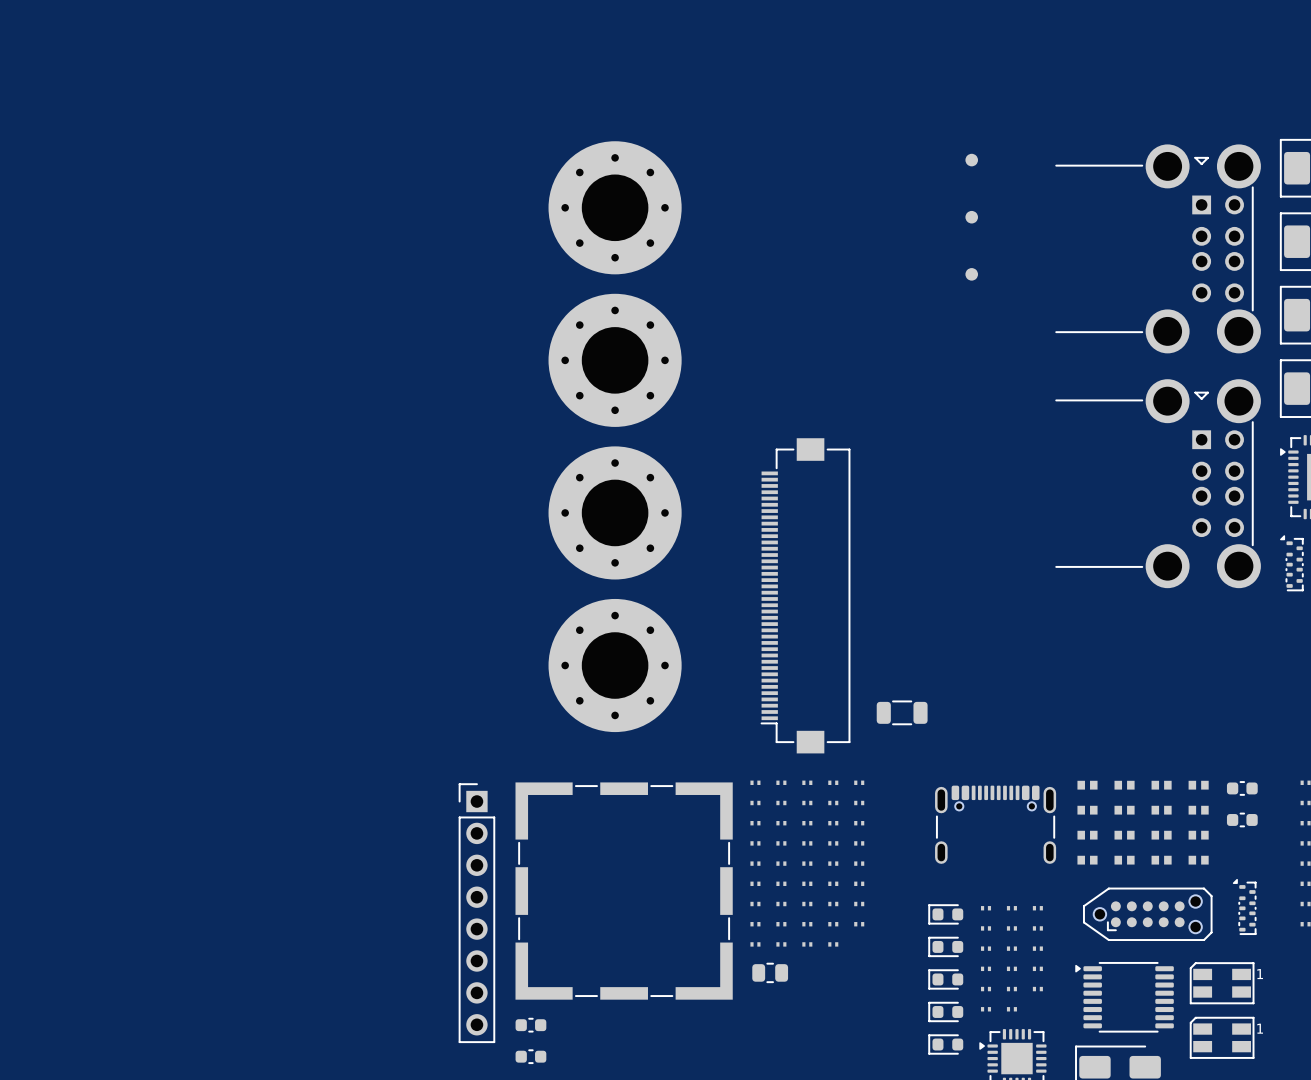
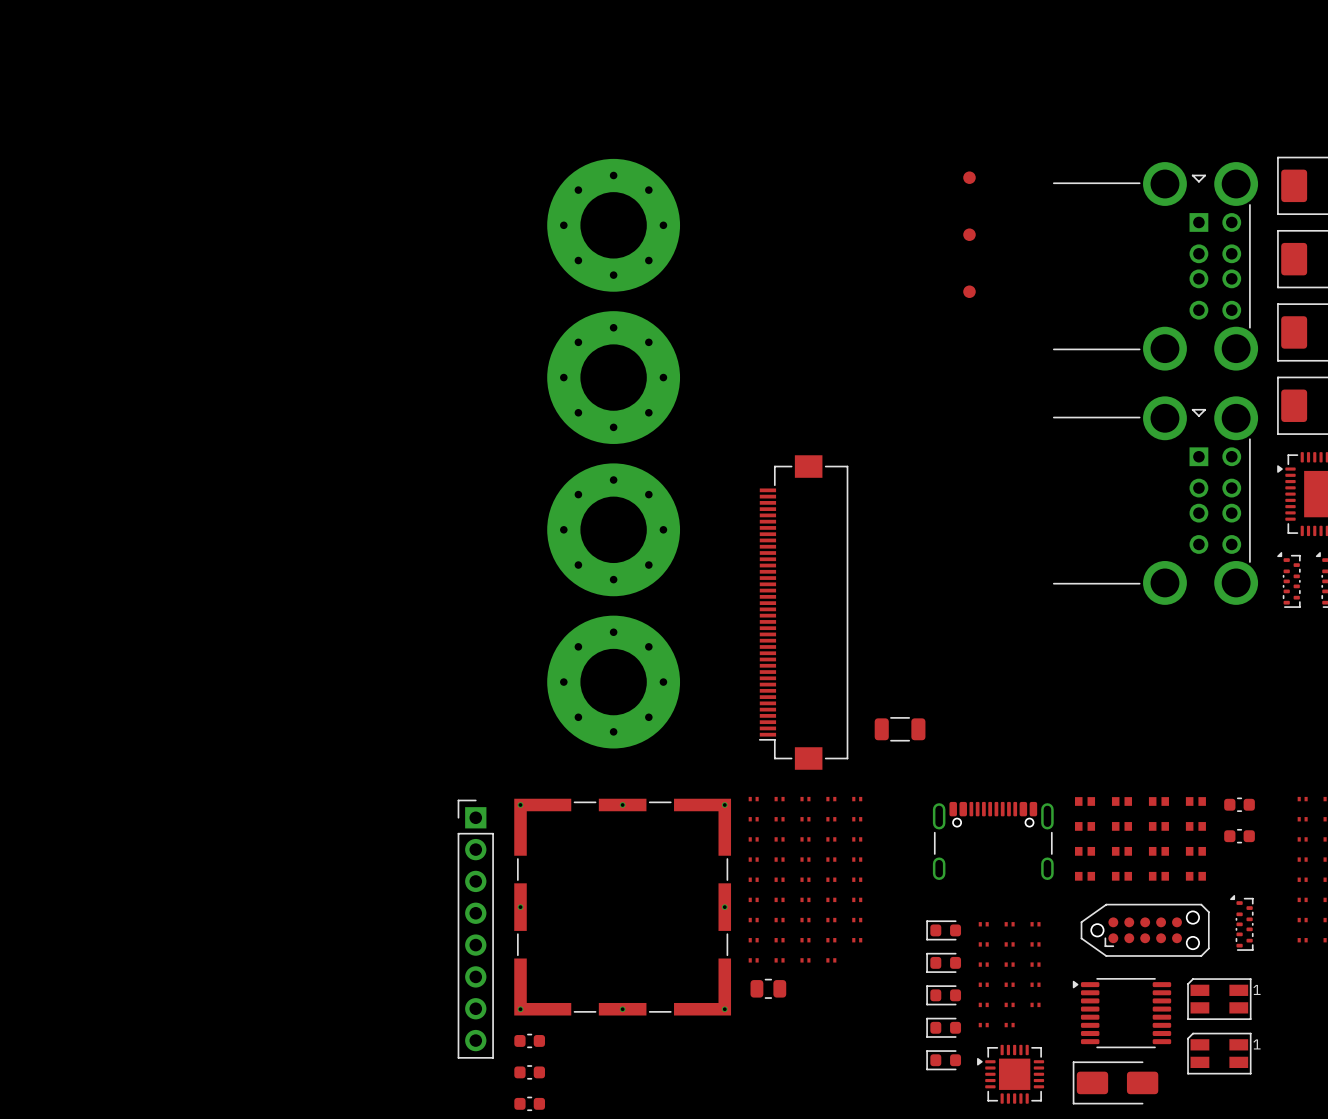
via: none -> (520, 804)
via: none -> (622, 804)
via: none -> (724, 804)
via: none -> (520, 907)
via: none -> (724, 907)
via: none -> (520, 1009)
via: none -> (622, 1009)
via: none -> (724, 1009)

